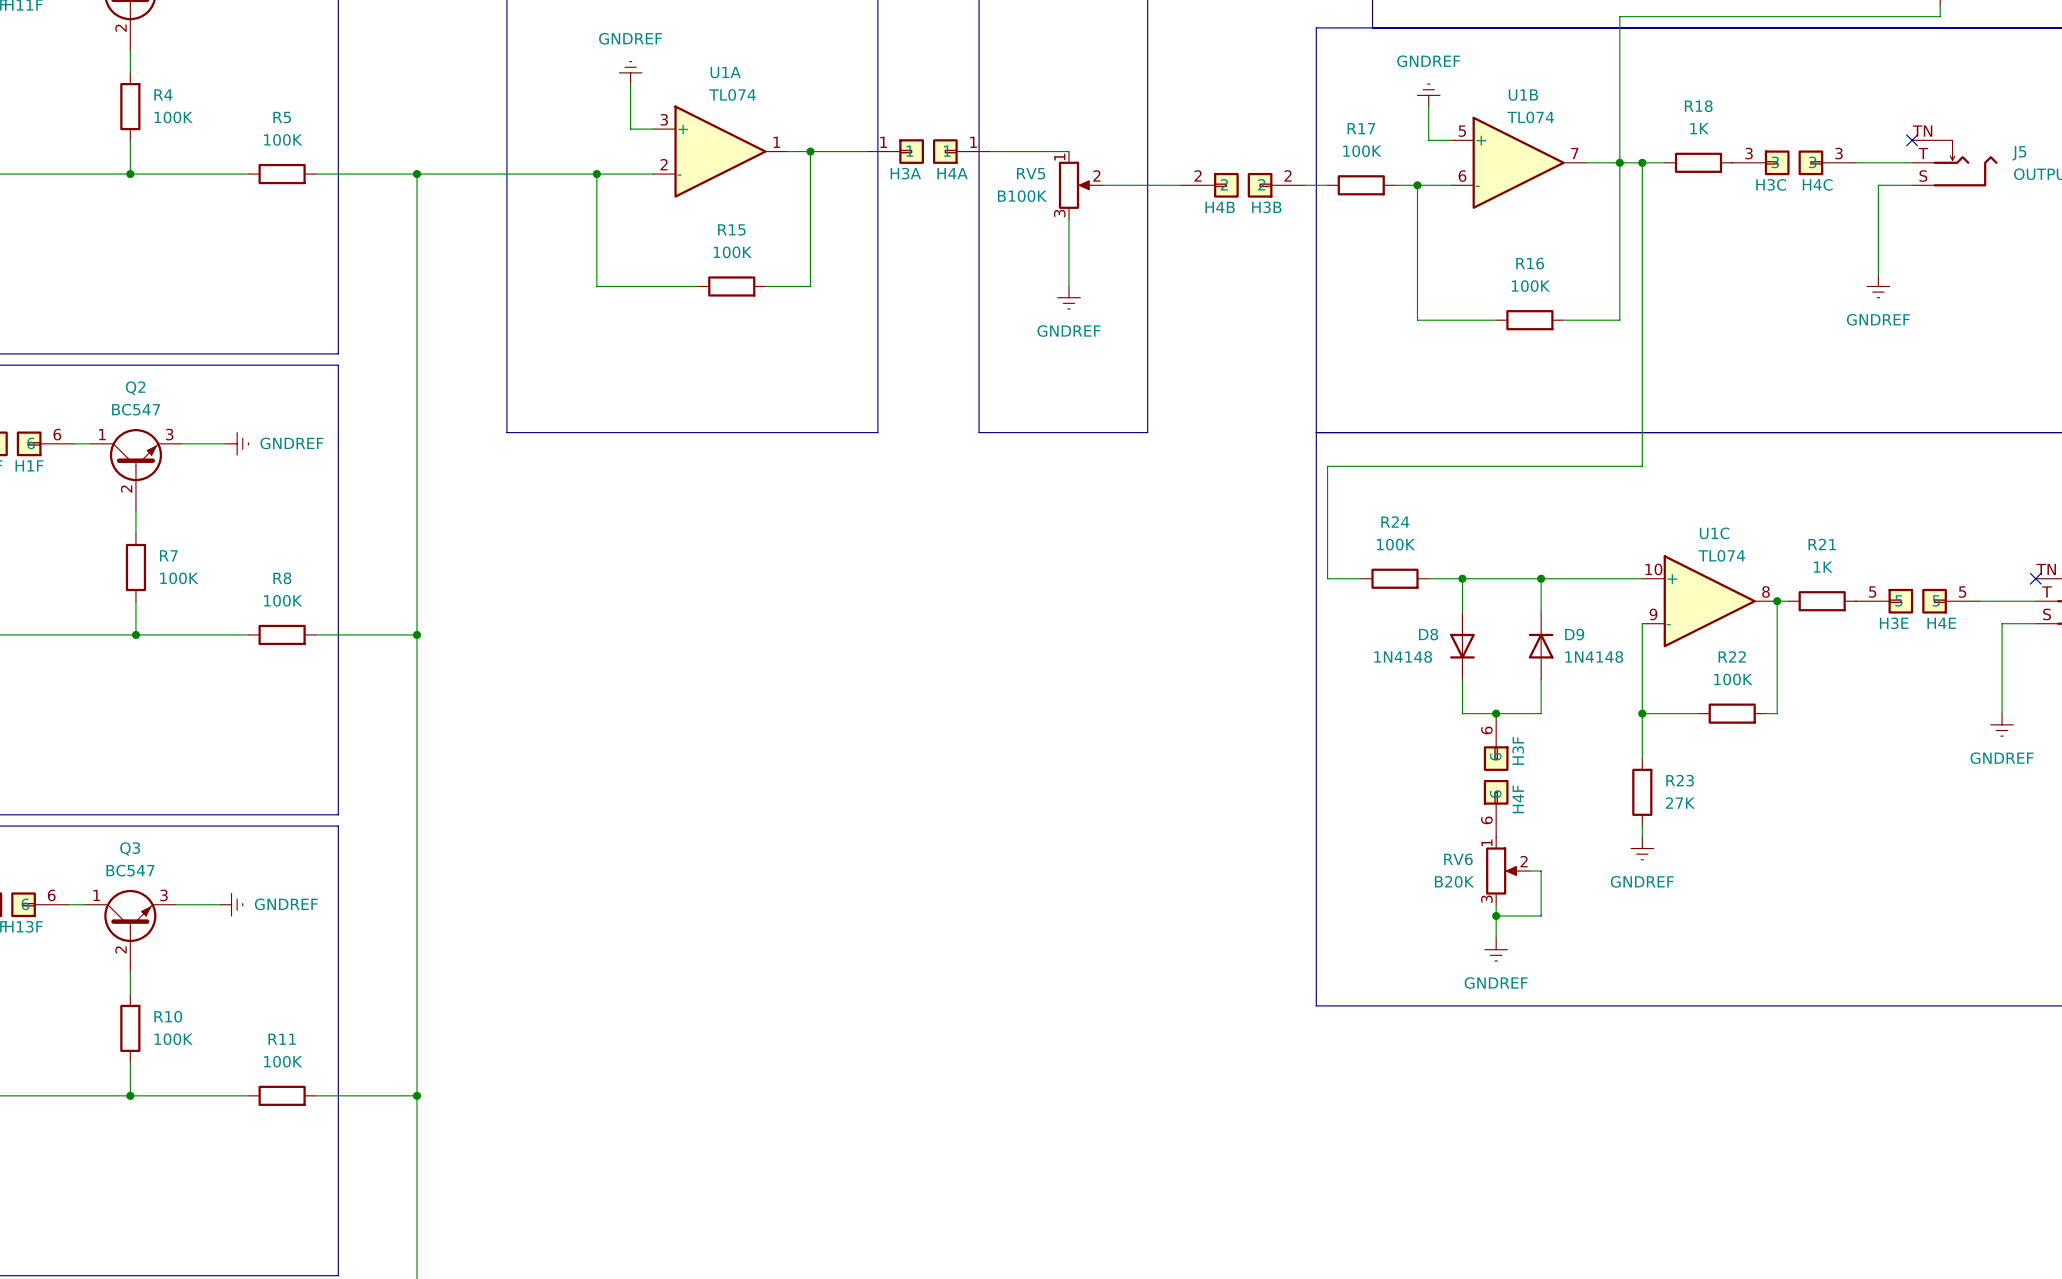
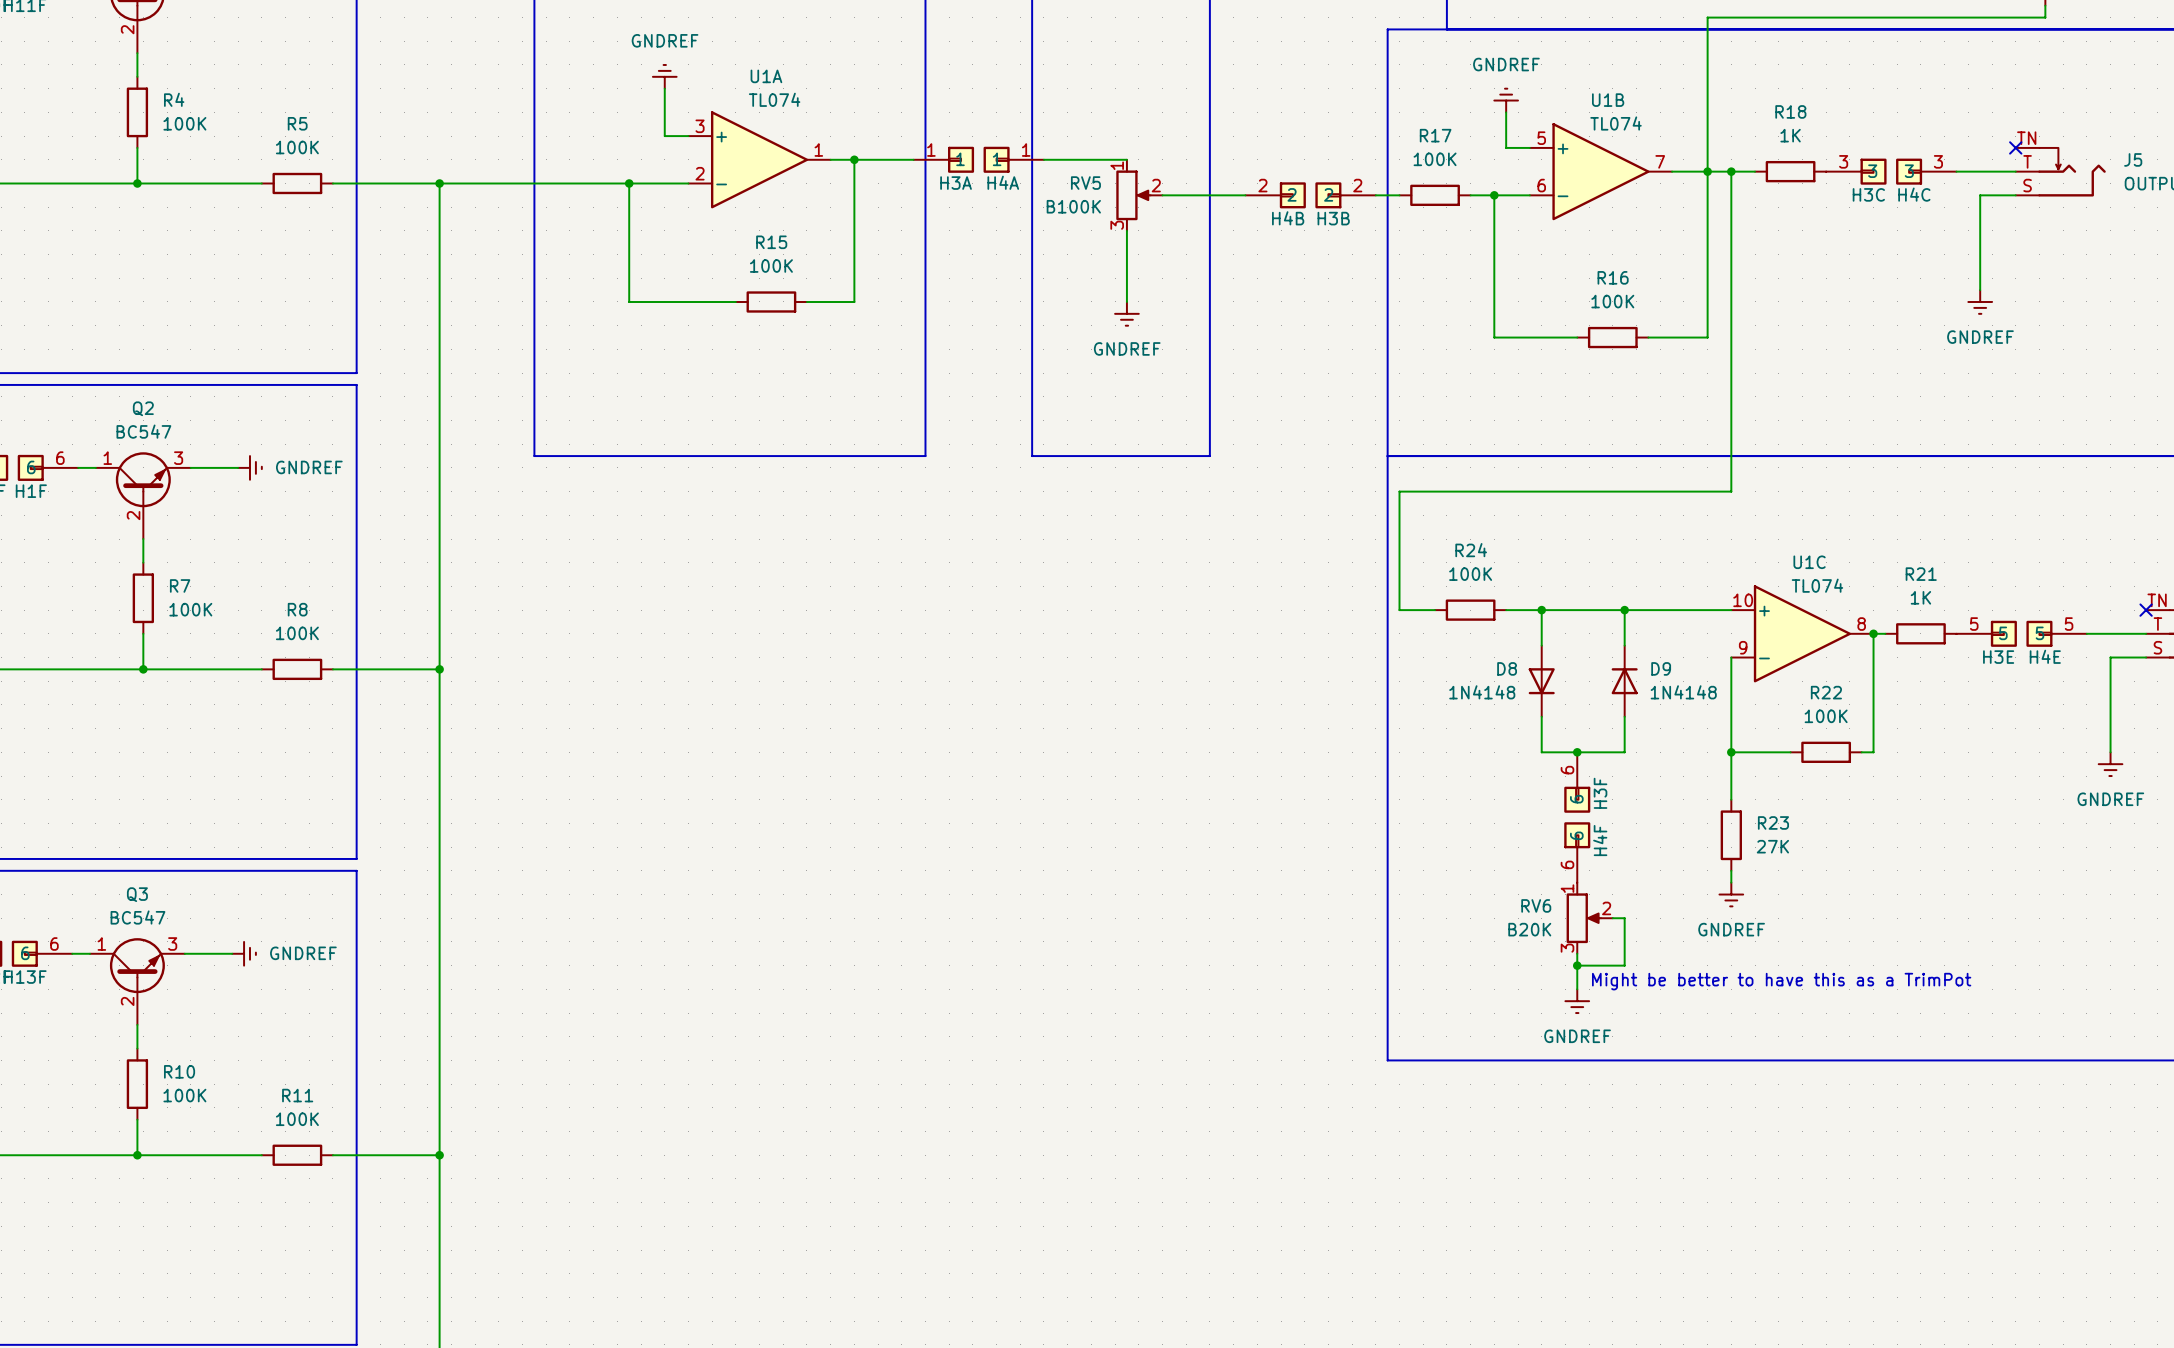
text: none -> Might be better to have this as a TrimPot (1781, 981)

